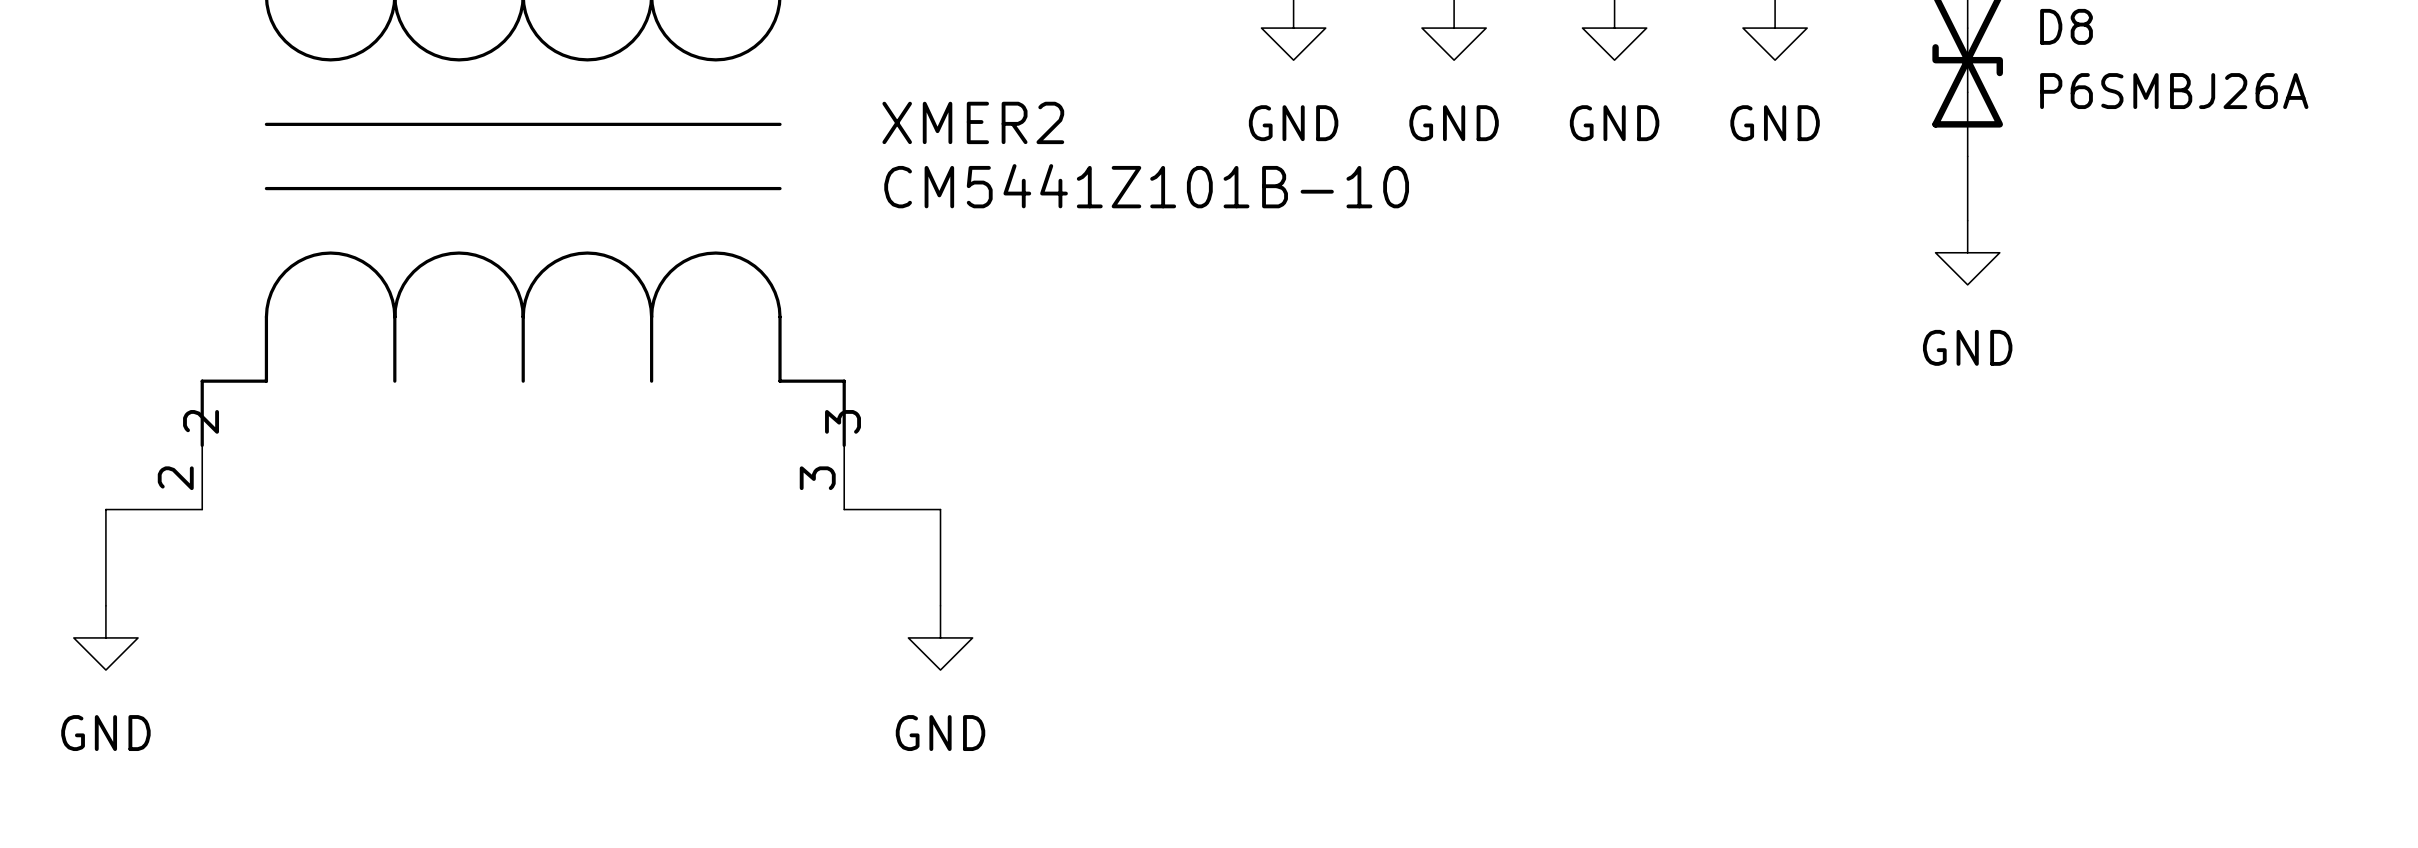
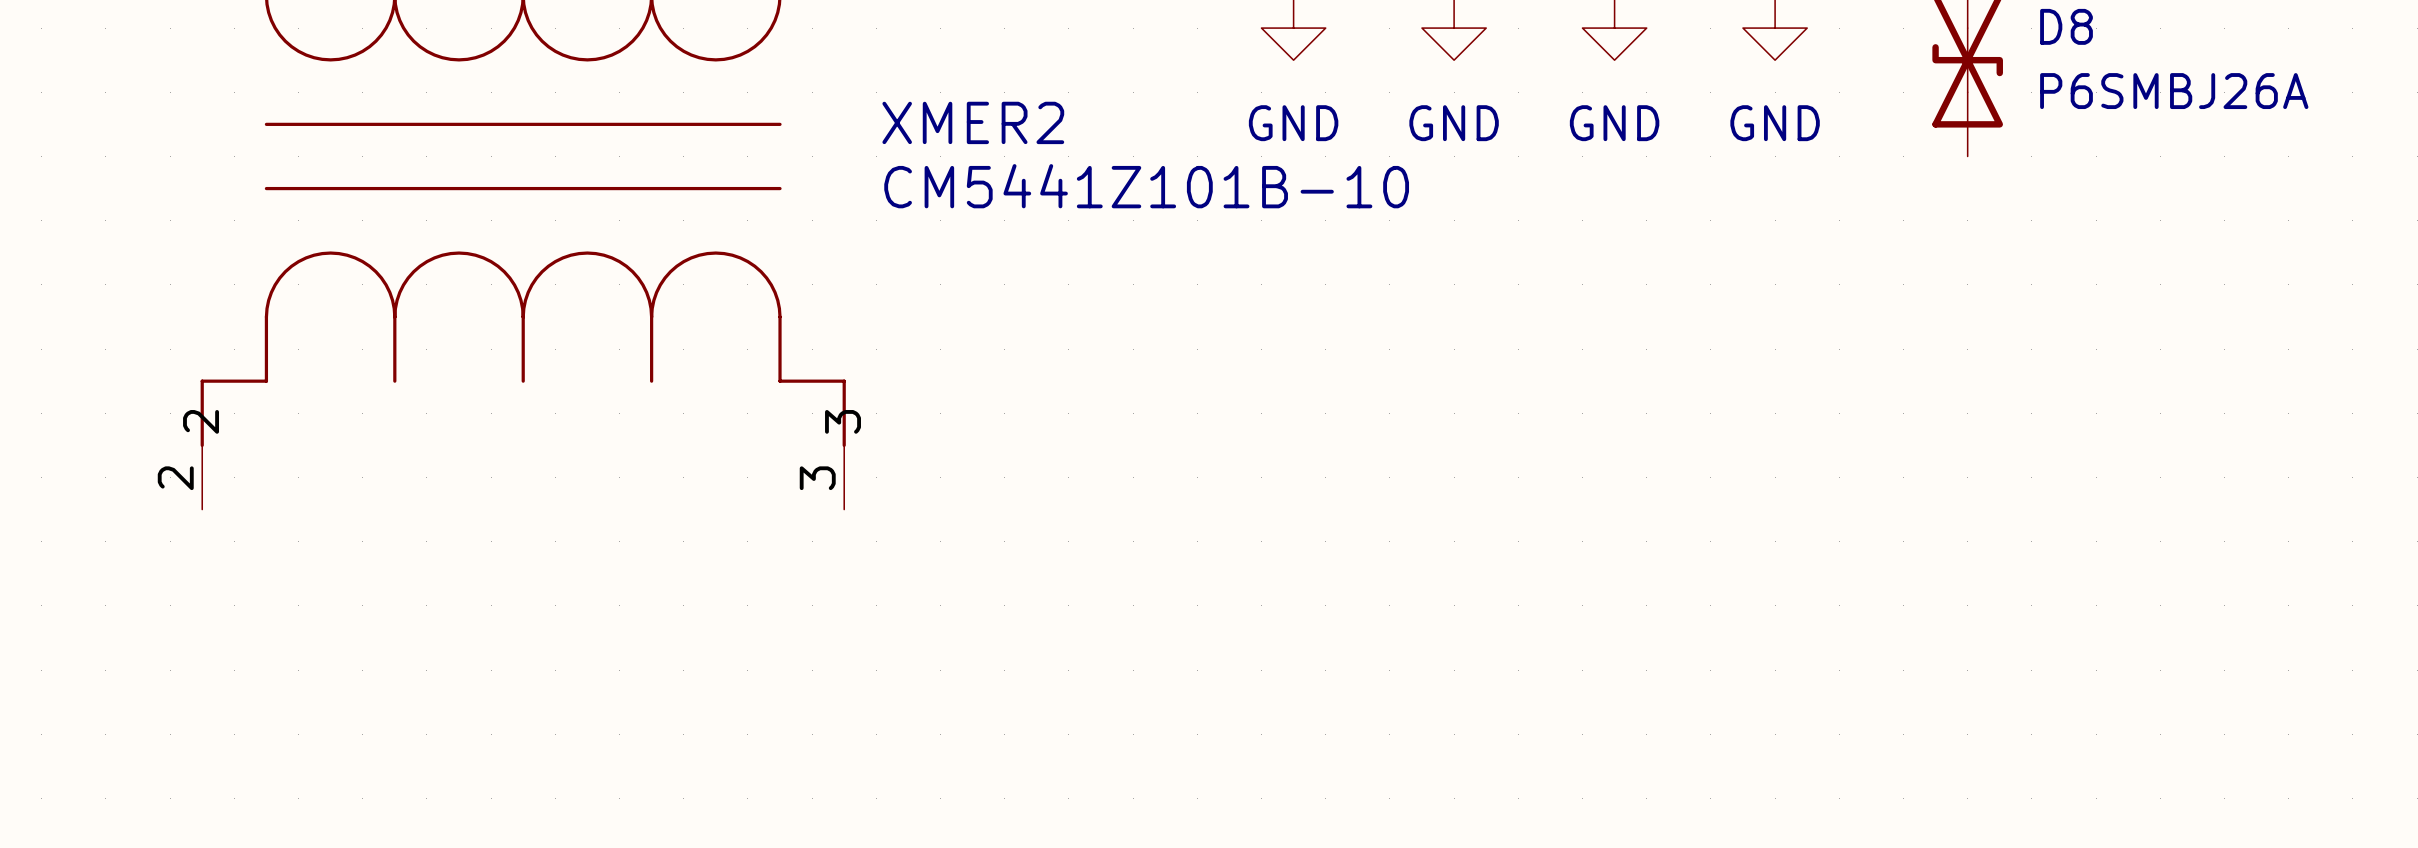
wire: (1967, 156) (1967, 220) -> none
power symbol: GND (1967, 252) -> none
wire: (202, 509) (105, 509) (105, 605) -> none
wire: (844, 509) (940, 509) (940, 605) -> none
power symbol: GND (105, 637) -> none
power symbol: GND (940, 637) -> none

